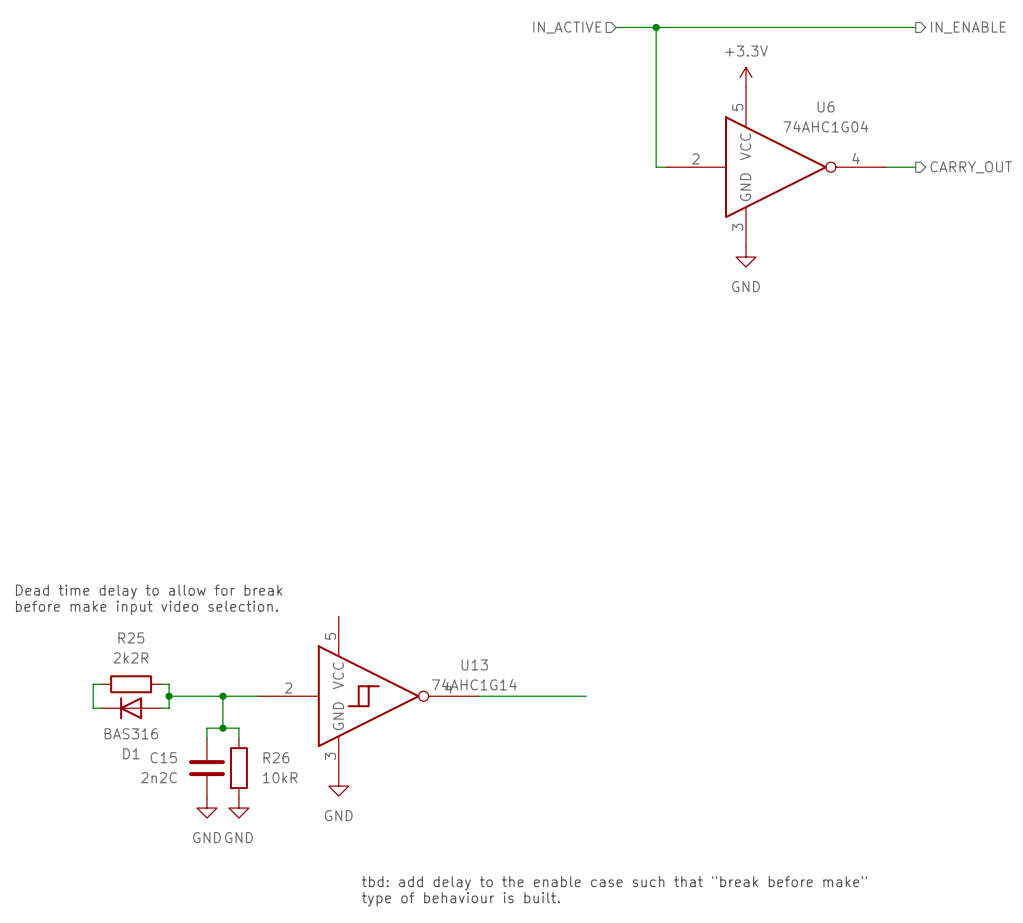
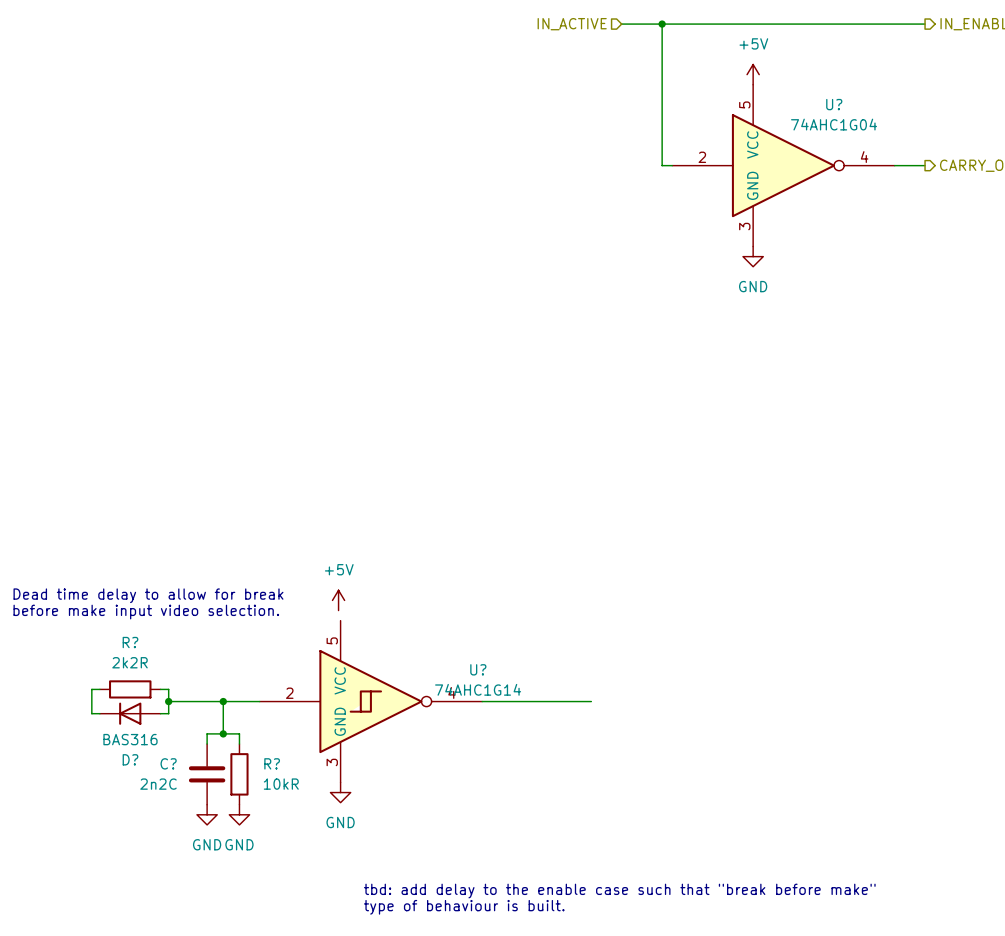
power symbol: +3.3V (746, 77) -> +5V (753, 74)
U6 name: U6 (826, 106) -> U? (834, 104)
power symbol: none -> +5V (338, 600)
R25 name: R25 (131, 637) -> R? (130, 642)
U13 name: U13 (474, 664) -> U? (478, 669)
D1 name: D1 (131, 753) -> D? (130, 759)
C15 name: C15 (163, 757) -> C? (168, 763)
R26 name: R26 (276, 757) -> R? (272, 763)

